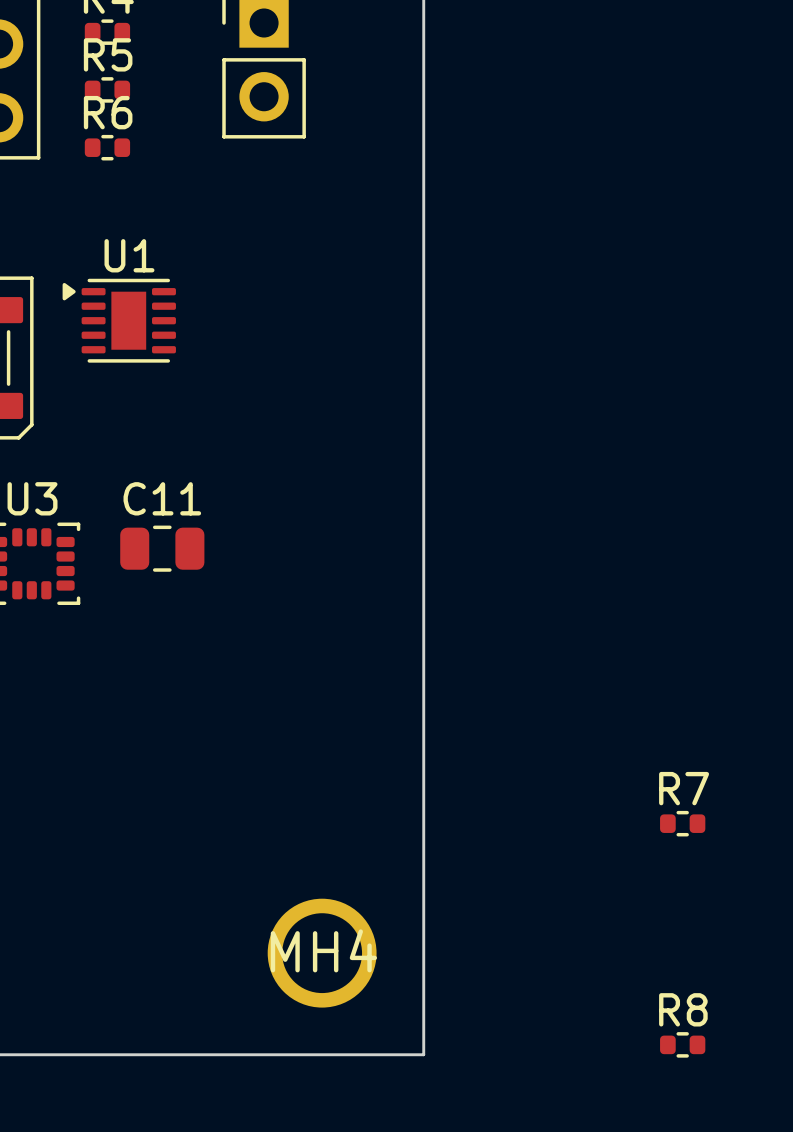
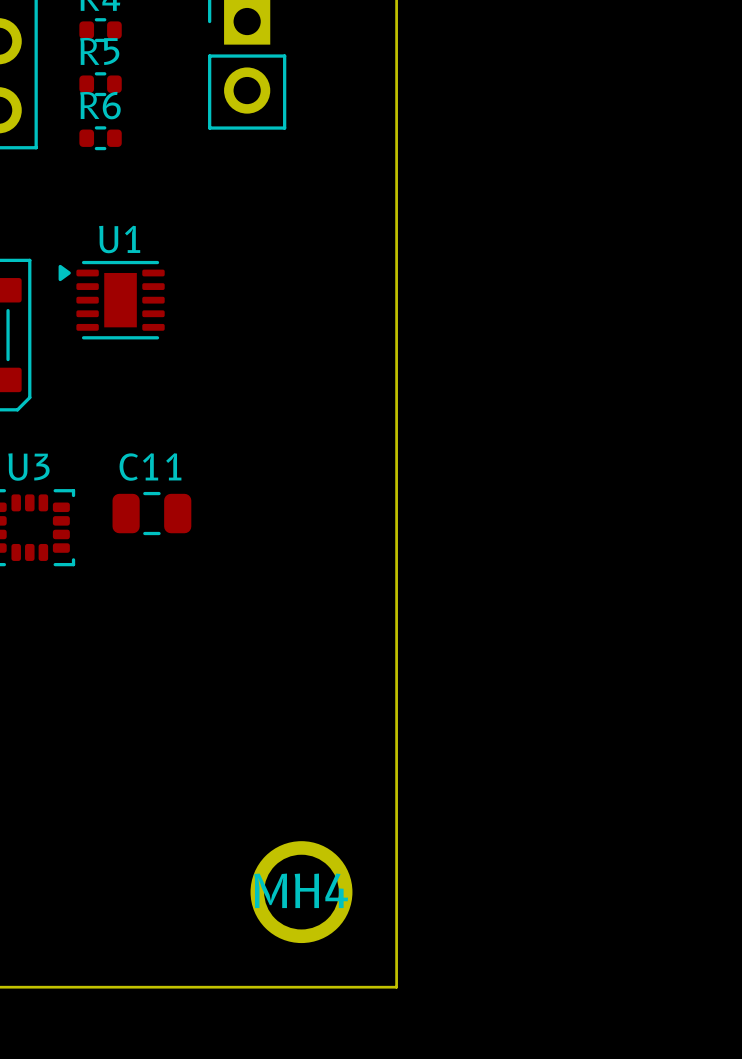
R7: (682, 823) -> none
R8: (682, 1044) -> none

